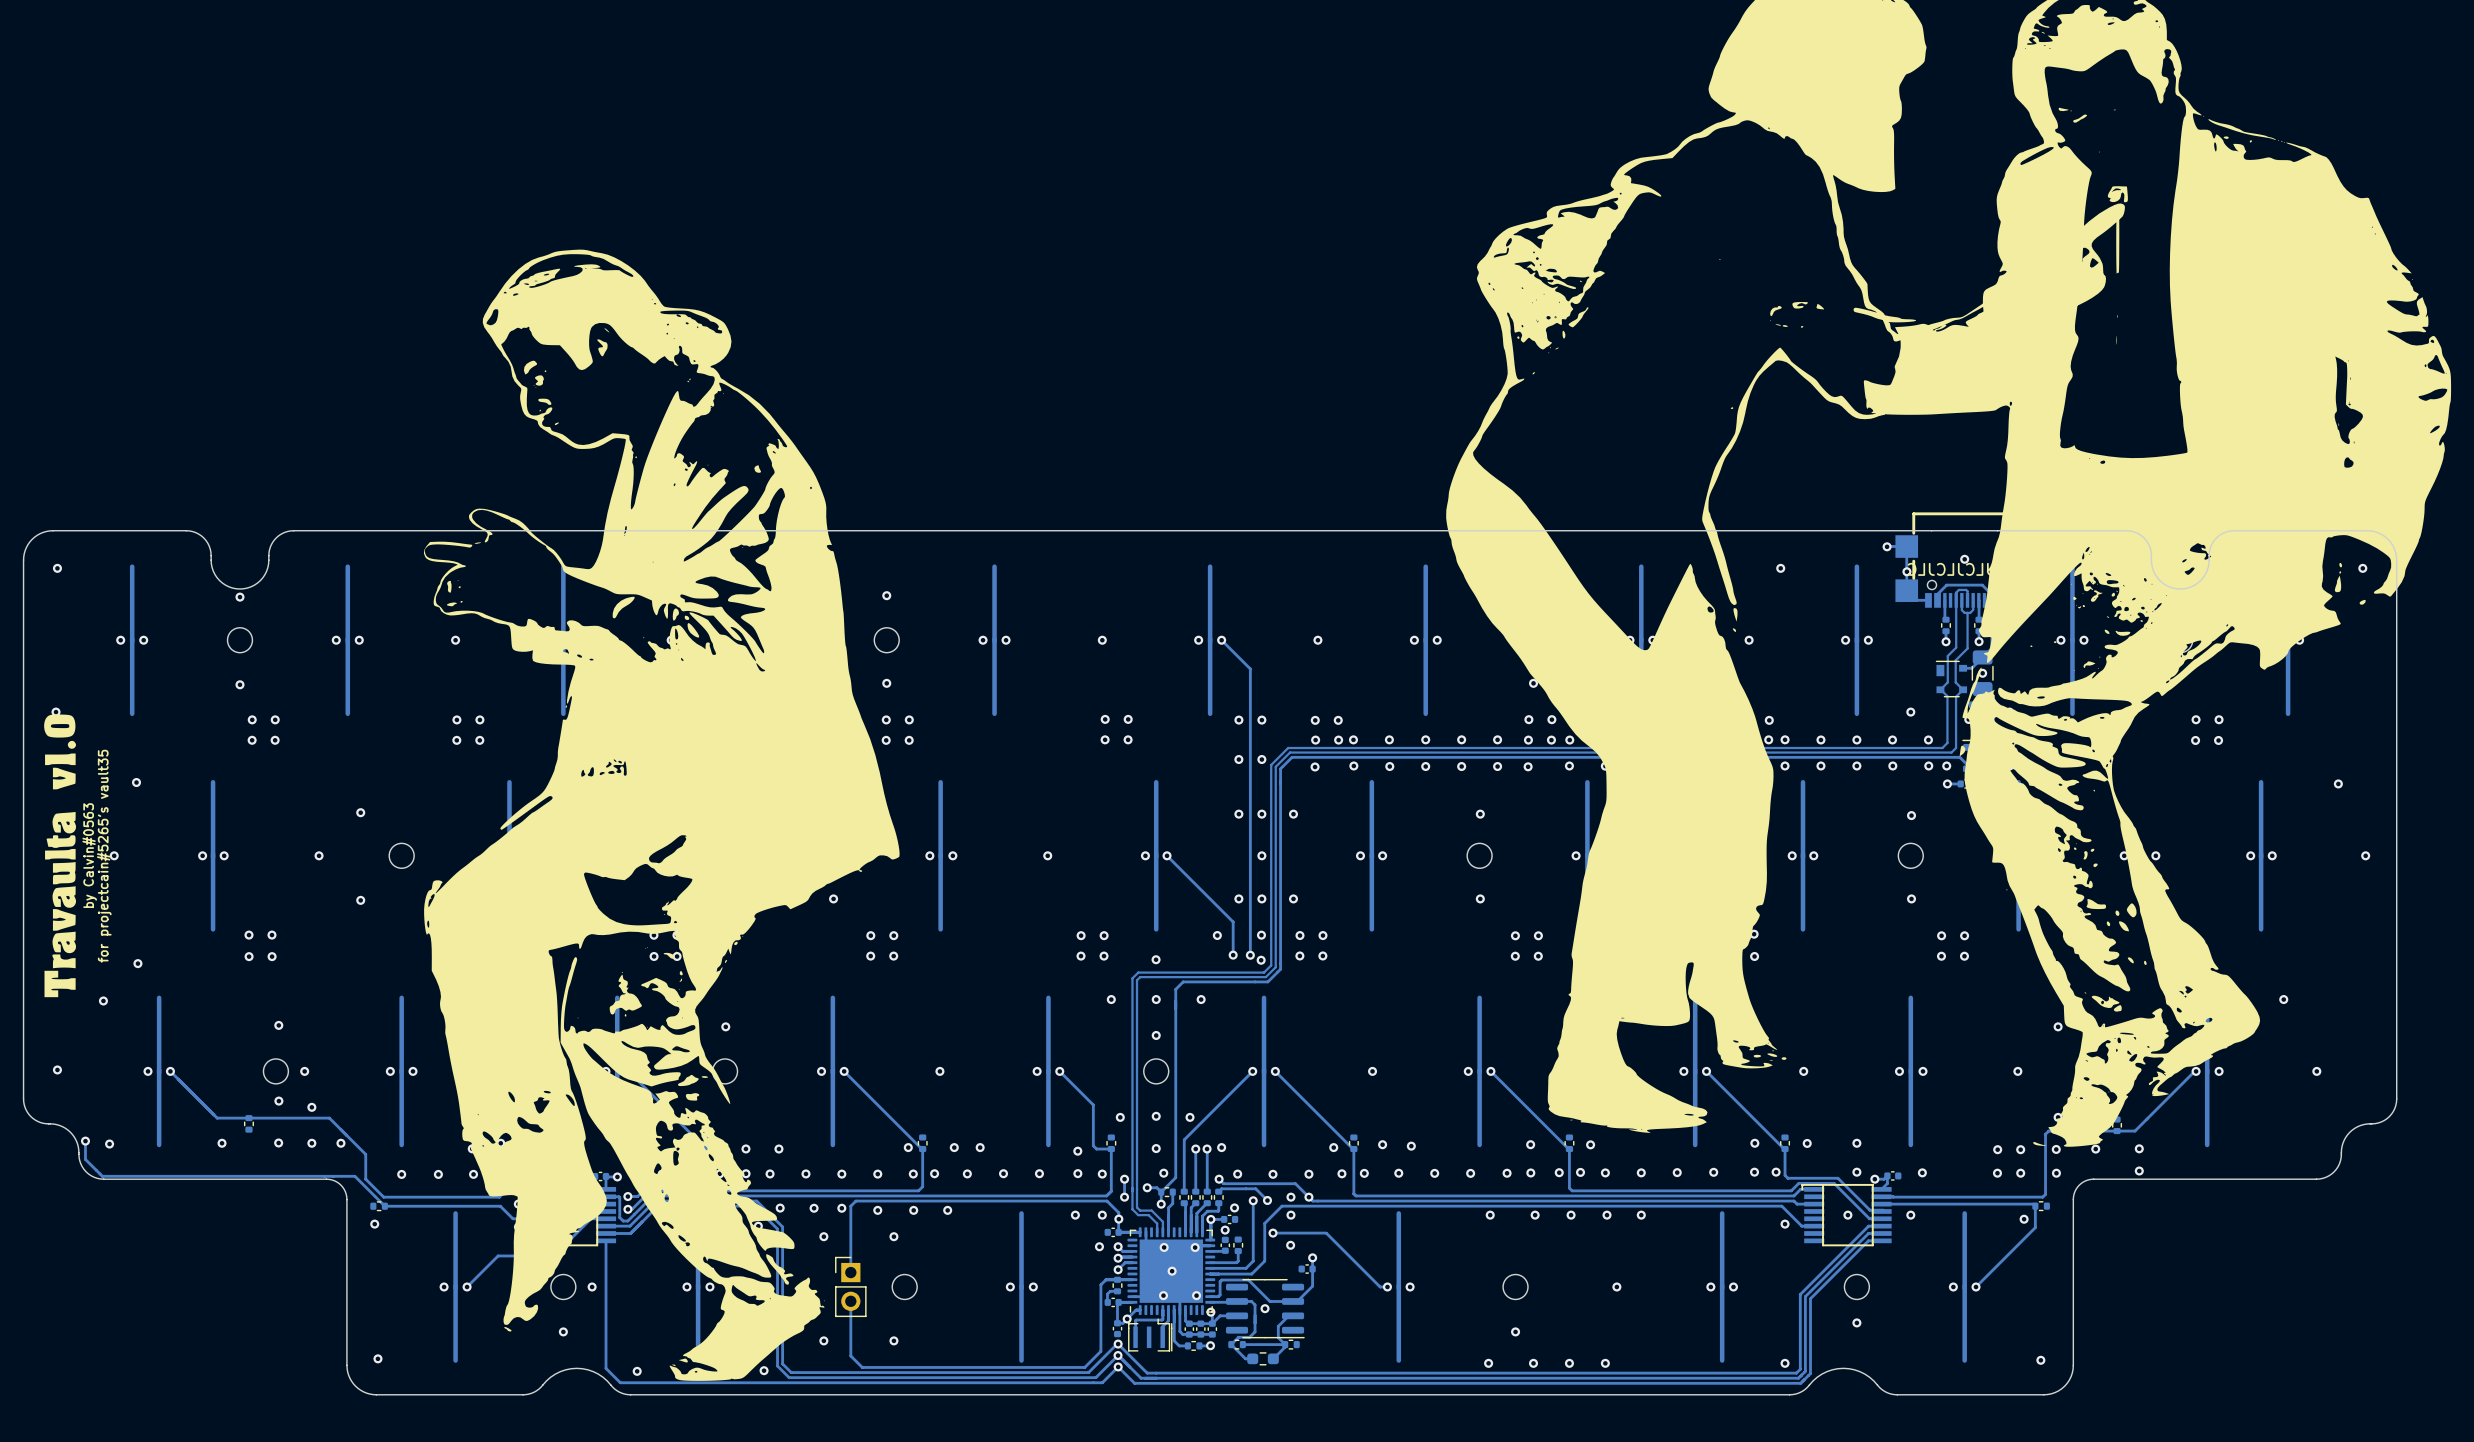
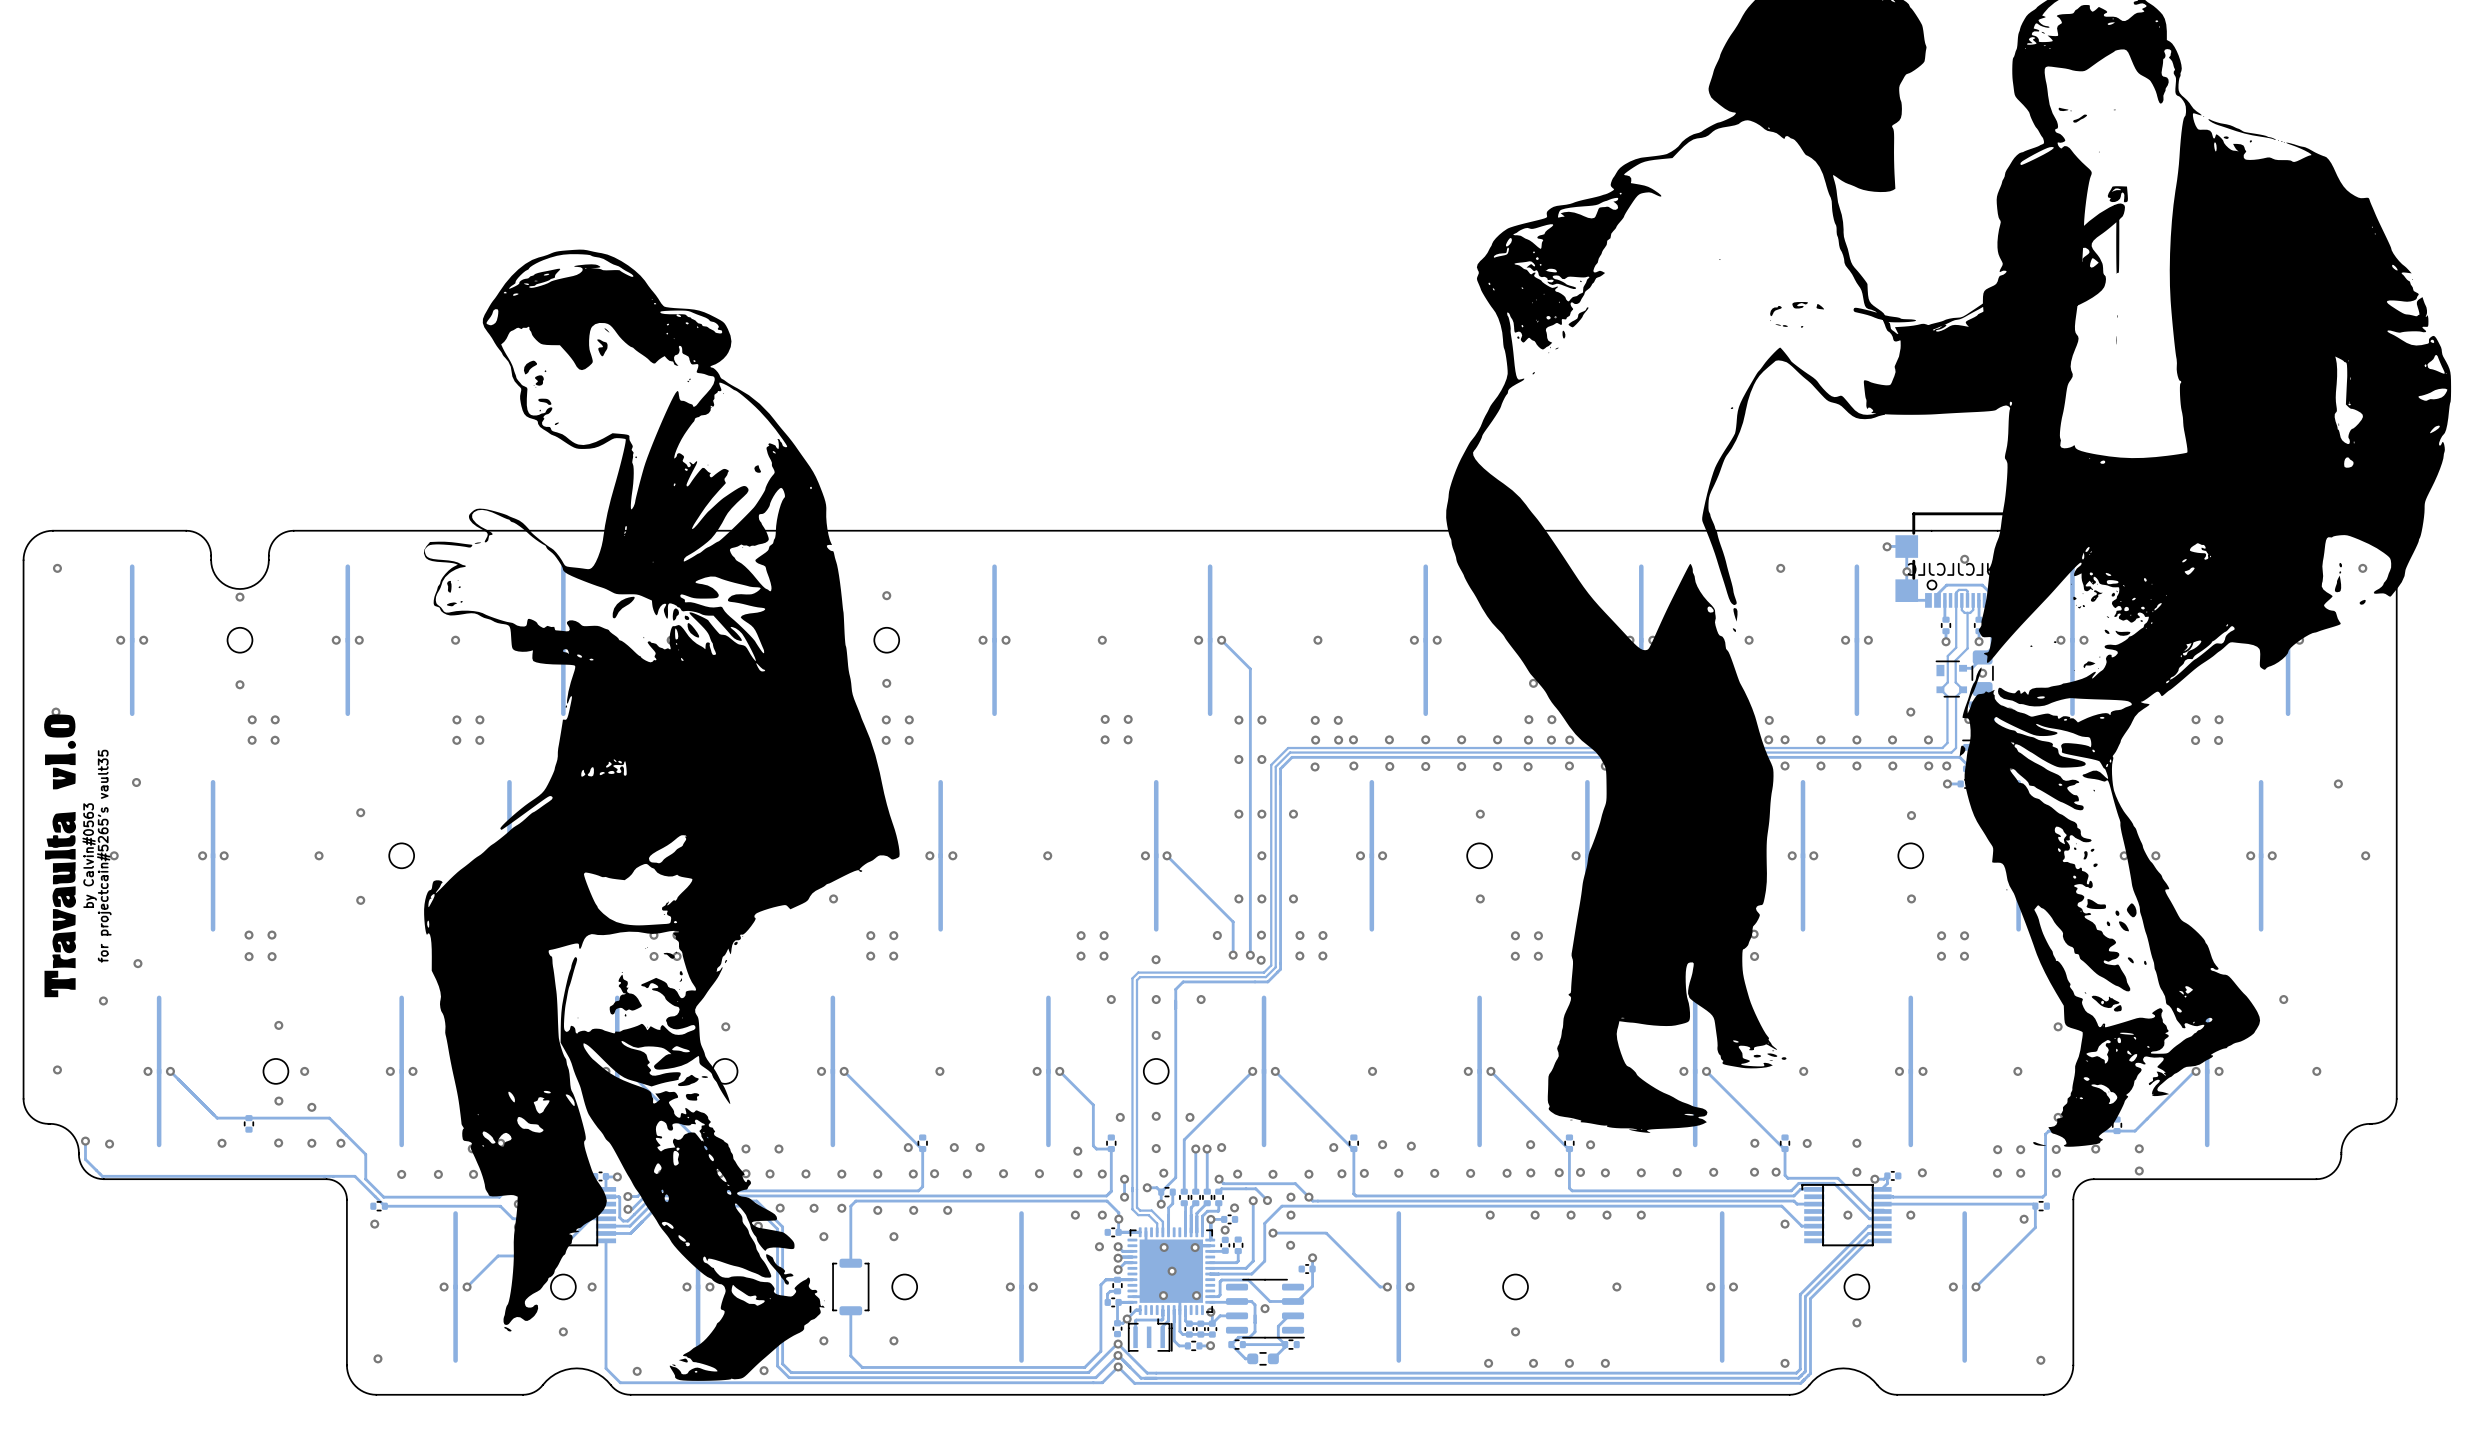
part footprint: [835, 1256, 867, 1318] -> [832, 1258, 870, 1316]

